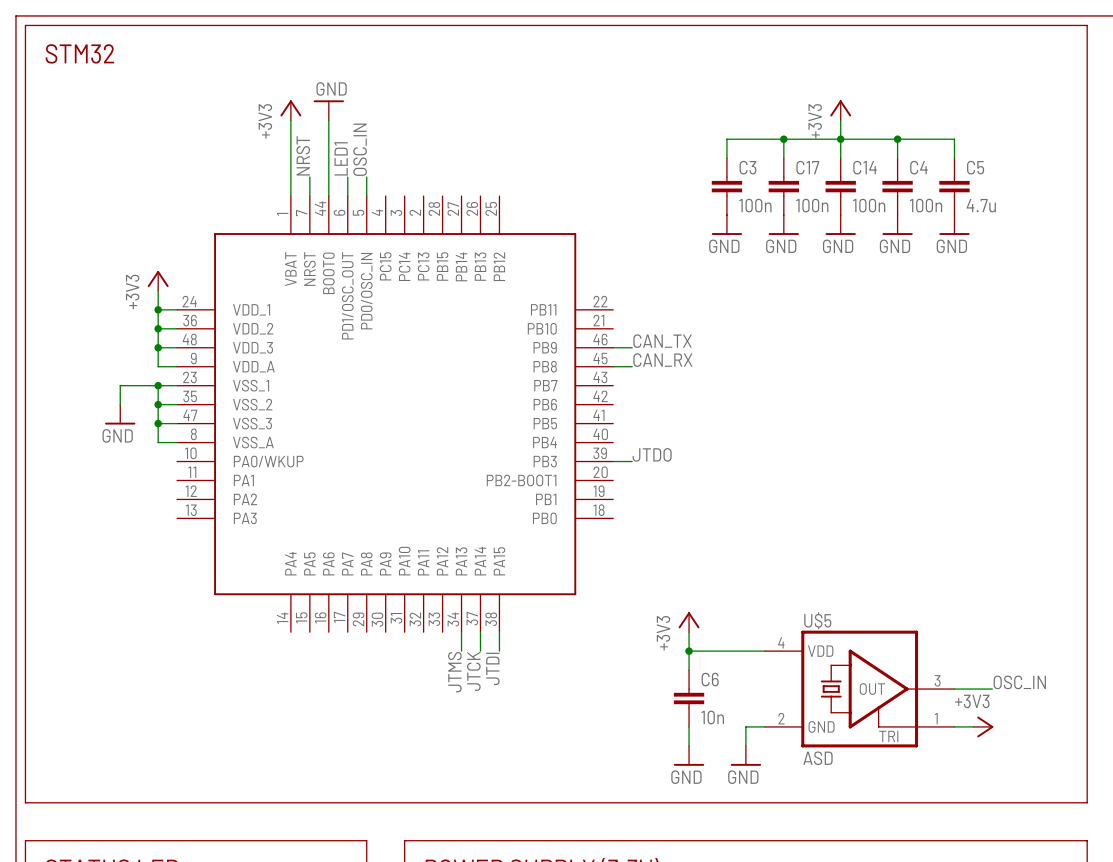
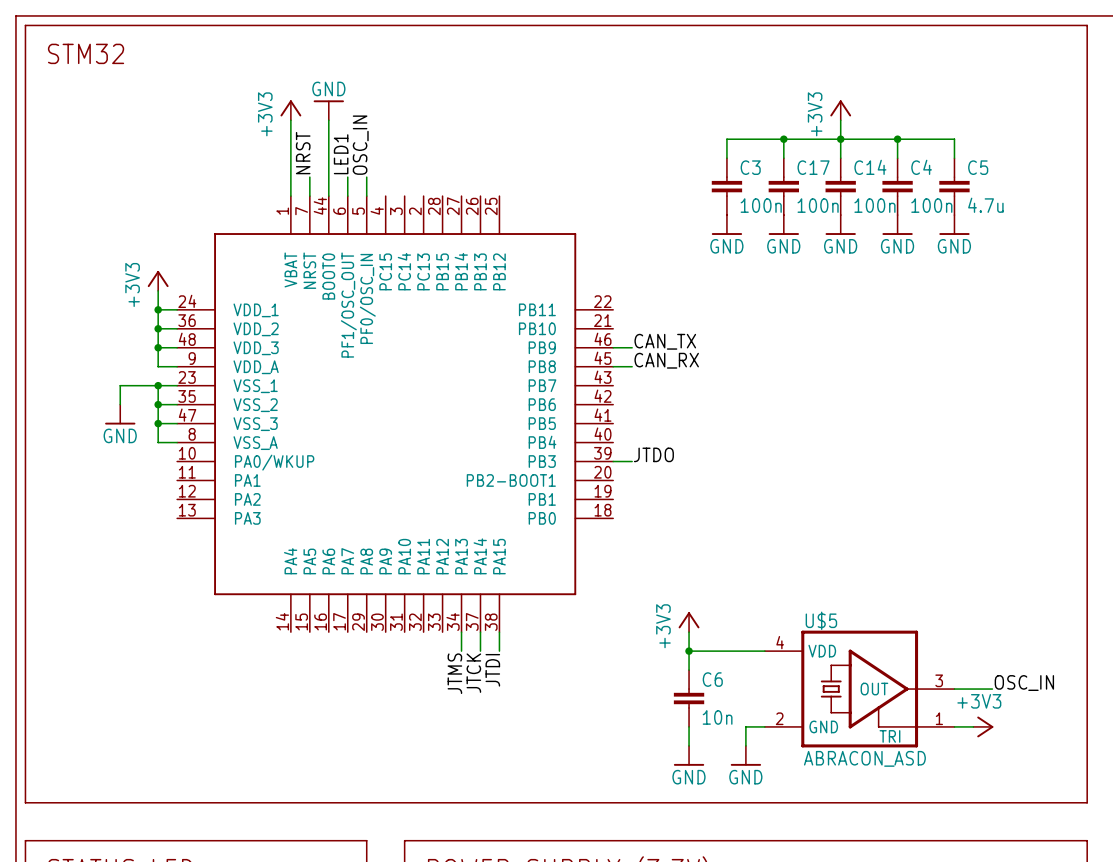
part pin name: PD0/OSC_IN (366, 291) -> PF0/OSC_IN (367, 298)
part pin name: PD1/OSC_OUT (347, 295) -> PF1/OSC_OUT (348, 305)
U$5 value: ASD (817, 758) -> ABRACON_ASD (864, 758)

